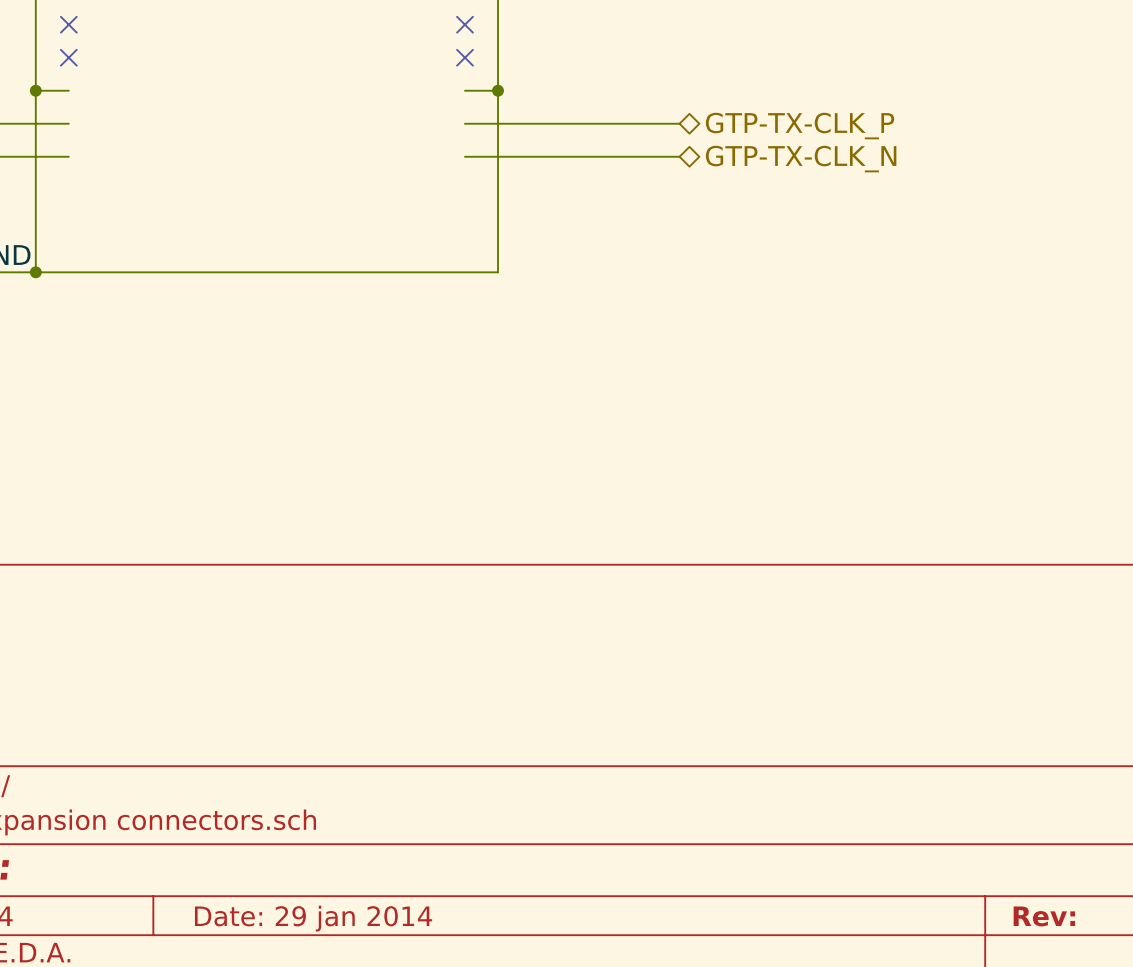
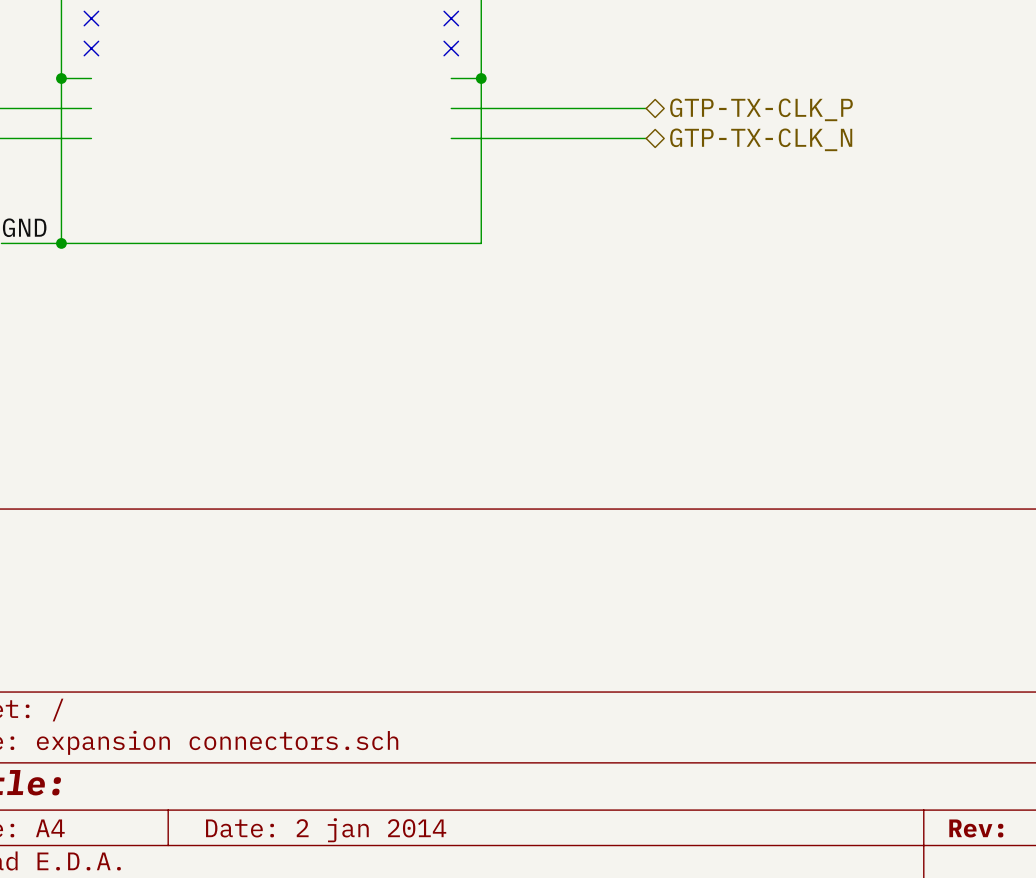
title block: Date: 29 jan 2014 (313, 918) -> Date: 2 jan 2014 (326, 830)

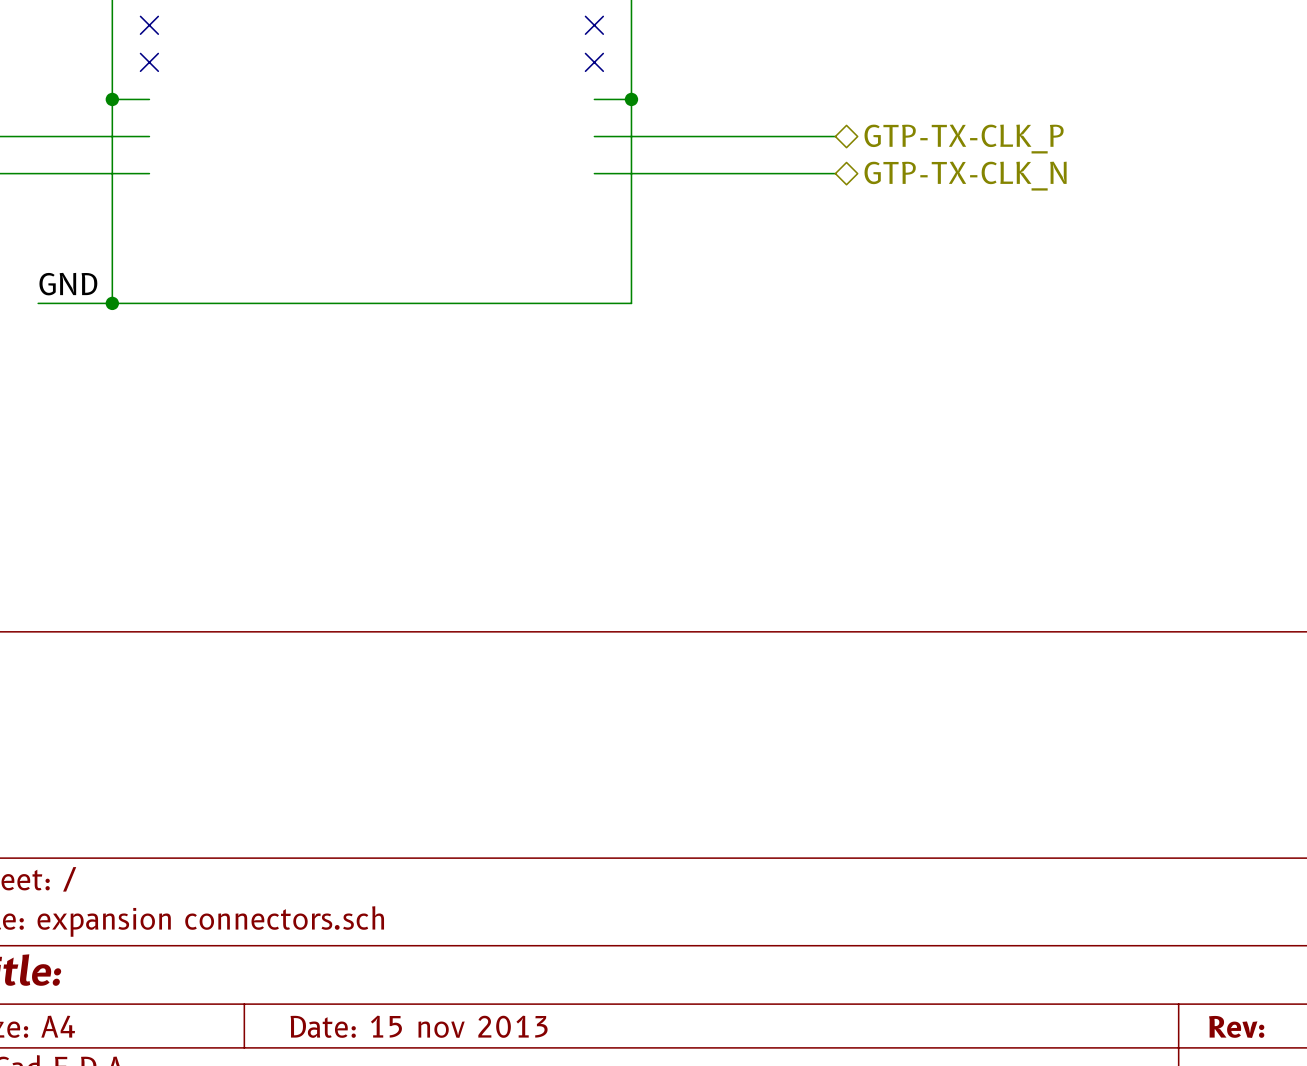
title block: Date: 2 jan 2014 (326, 830) -> Date: 15 nov 2013 (419, 1026)

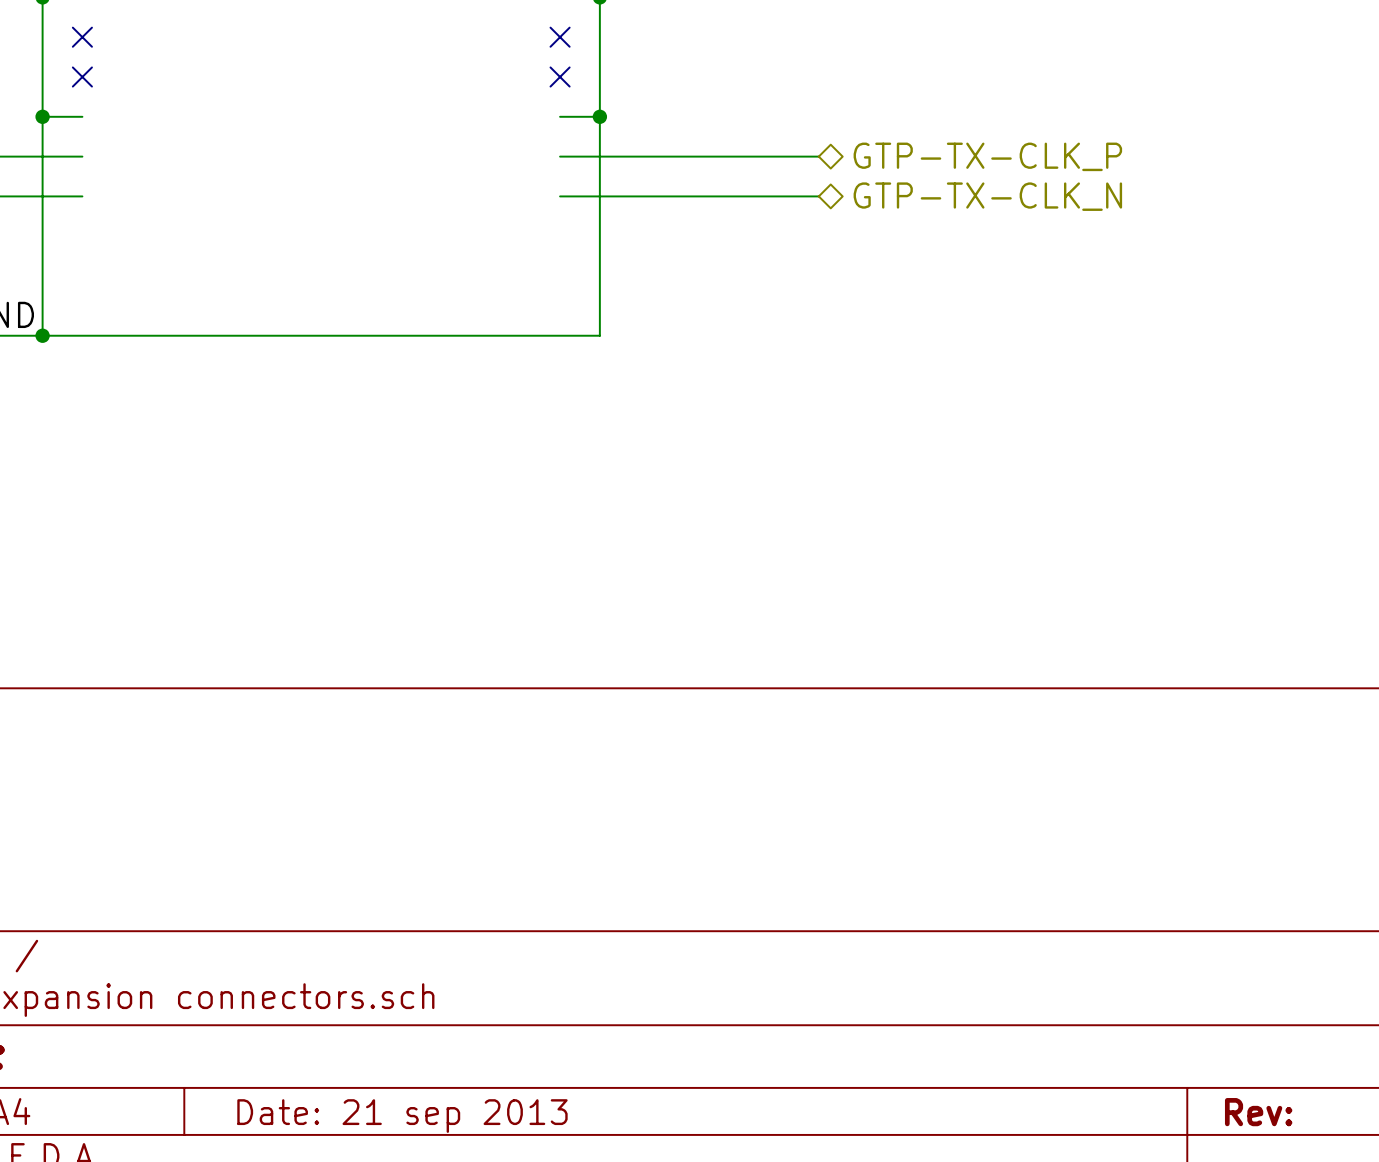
title block: Date: 15 nov 2013 (419, 1026) -> Date: 21 sep 2013 (402, 1116)

